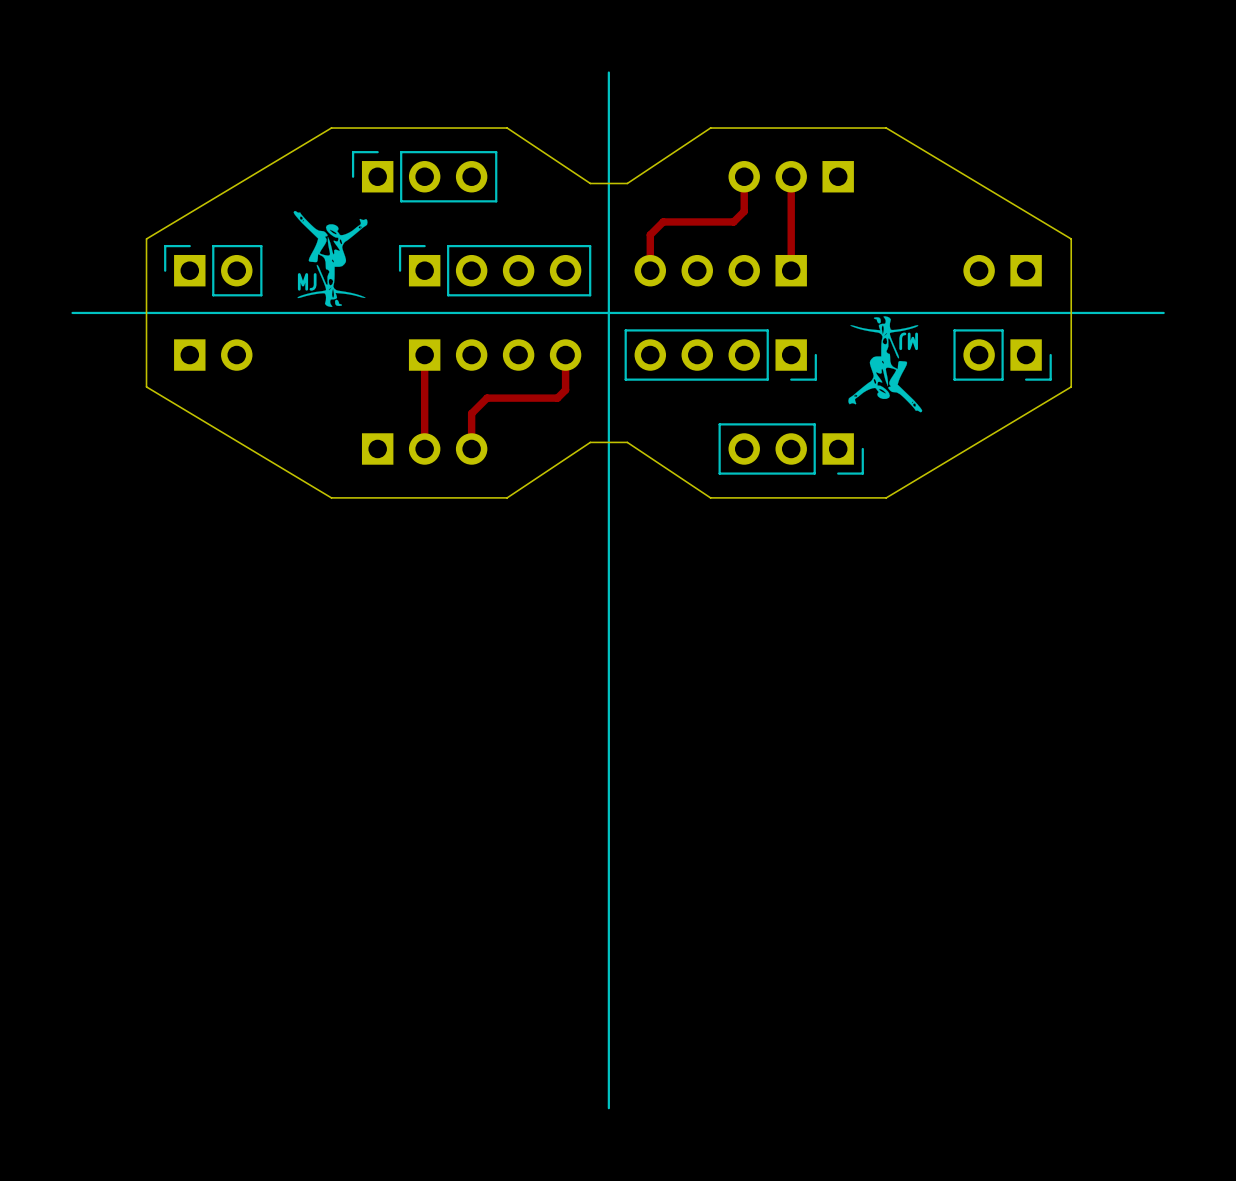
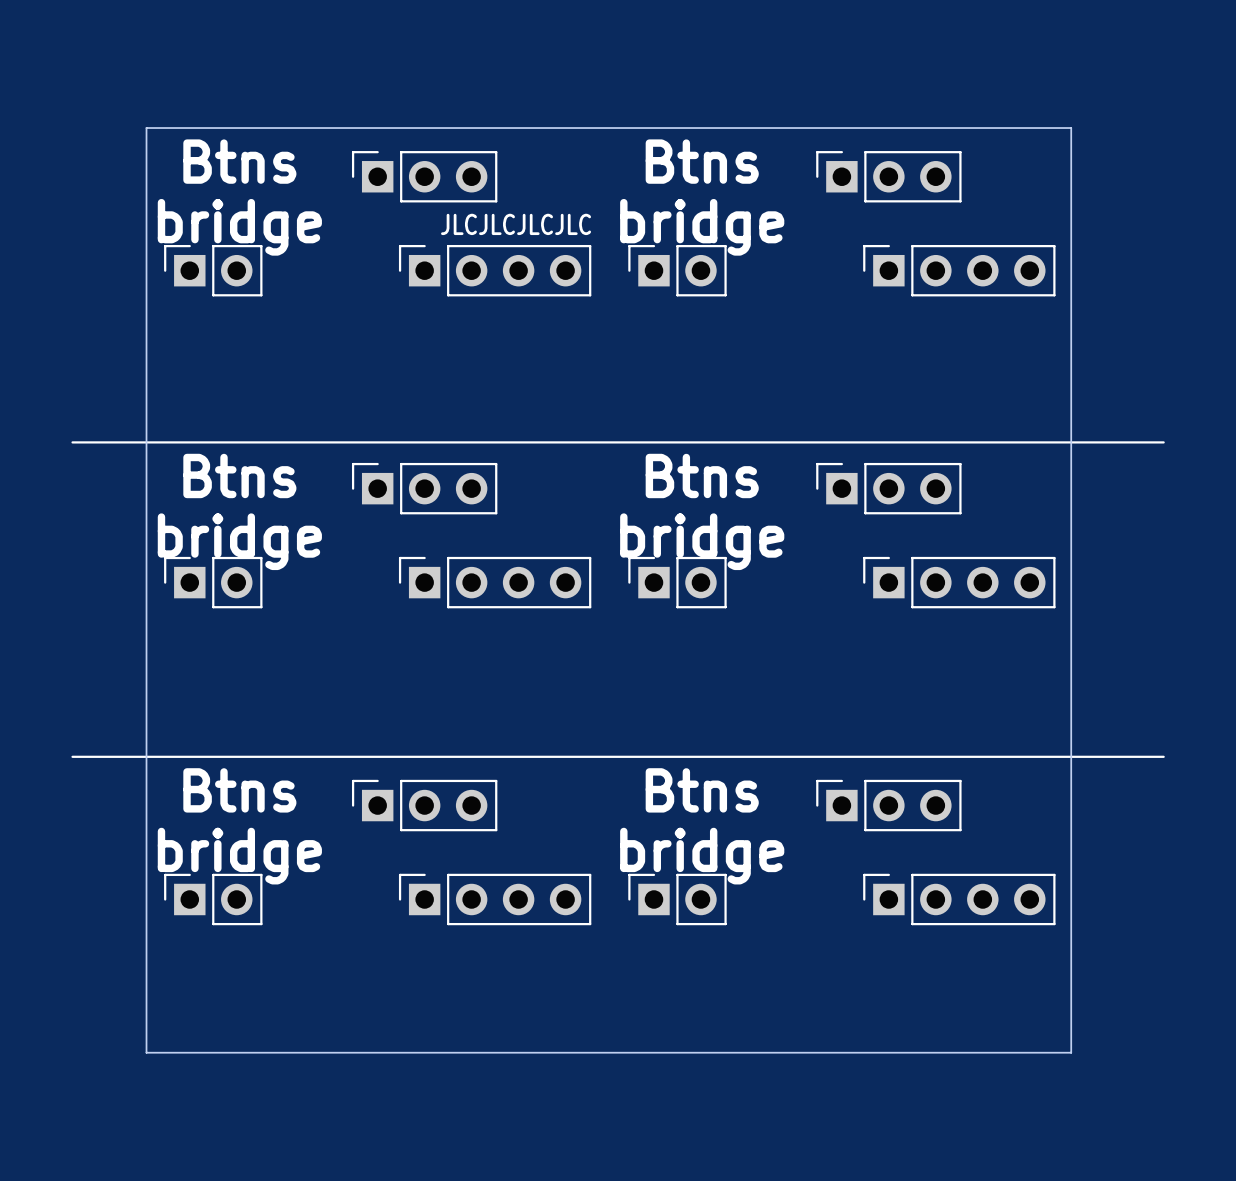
line: (608, 72) (608, 1108) -> none
board edge: (331, 128) (146, 238) -> (331, 128) (146, 128) (146, 238)
board edge: (507, 128) (590, 183) (627, 183) (710, 128) -> (507, 128) (710, 128)
board edge: (886, 128) (1071, 238) -> (886, 128) (1071, 128) (1071, 238)
text: none -> Btns (239, 161)
text: none -> Btns (702, 161)
track: (744, 176) (744, 211) (733, 221) (663, 221) (650, 234) (650, 270) -> none
track: (791, 176) (791, 270) -> none
part side: bottom (791, 176) -> top (888, 176)
drawing: [293, 210, 368, 307] -> none
text: none -> JLCJLCJLCJLC (516, 224)
text: none -> bridge (239, 227)
text: none -> bridge (702, 227)
part side: bottom (720, 270) -> top (959, 270)
part side: bottom (1002, 270) -> top (677, 270)
text: MJ (307, 281) -> none
line: (72, 312) (1163, 312) -> (72, 442) (1163, 442)
drawing: [848, 316, 923, 413] -> none
text: MJ (908, 341) -> none
part side: bottom (213, 355) -> top (213, 582)
track: (424, 355) (424, 448) -> none
part side: bottom (495, 355) -> top (495, 582)
track: (565, 355) (565, 390) (557, 398) (487, 398) (471, 413) (471, 448) -> none
part: (720, 355) -> none
part: (1002, 355) -> none
board edge: (146, 386) (331, 497) (507, 497) (590, 442) (627, 442) (710, 497) (886, 497) (1071, 386) -> (146, 386) (146, 1052) (1071, 1052) (1071, 386)
part side: bottom (424, 448) -> top (424, 488)
part rotation: 0° (791, 448) -> 180° (888, 488)
part position: (791, 448) -> (888, 488)
text: none -> Btns (239, 475)
text: none -> Btns (702, 475)
text: none -> bridge (239, 541)
text: none -> bridge (702, 541)
part: none -> (677, 582)
part: none -> (959, 582)
line: none -> (72, 756) (1163, 756)
text: none -> Btns (239, 790)
text: none -> Btns (702, 790)
part: none -> (424, 805)
part: none -> (888, 805)
text: none -> bridge (239, 856)
text: none -> bridge (702, 856)
part: none -> (213, 899)
part: none -> (495, 899)
part: none -> (677, 899)
part: none -> (959, 899)

